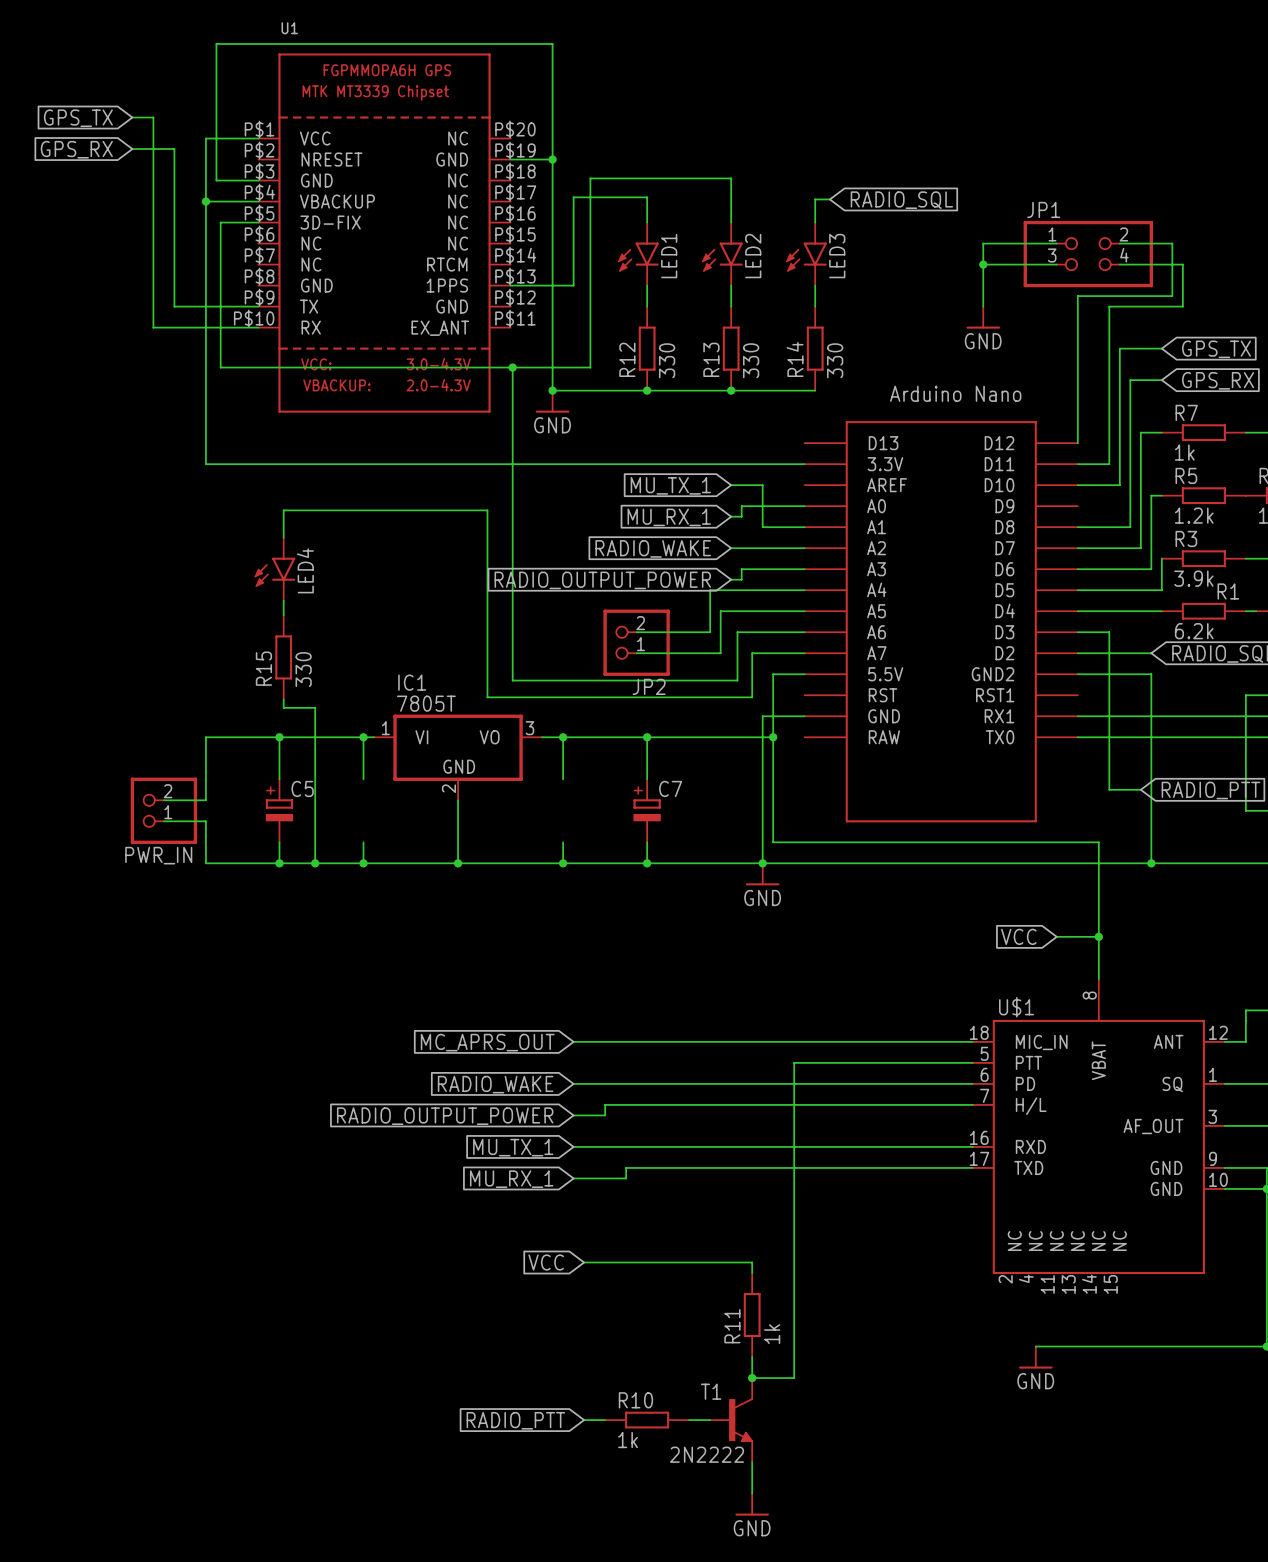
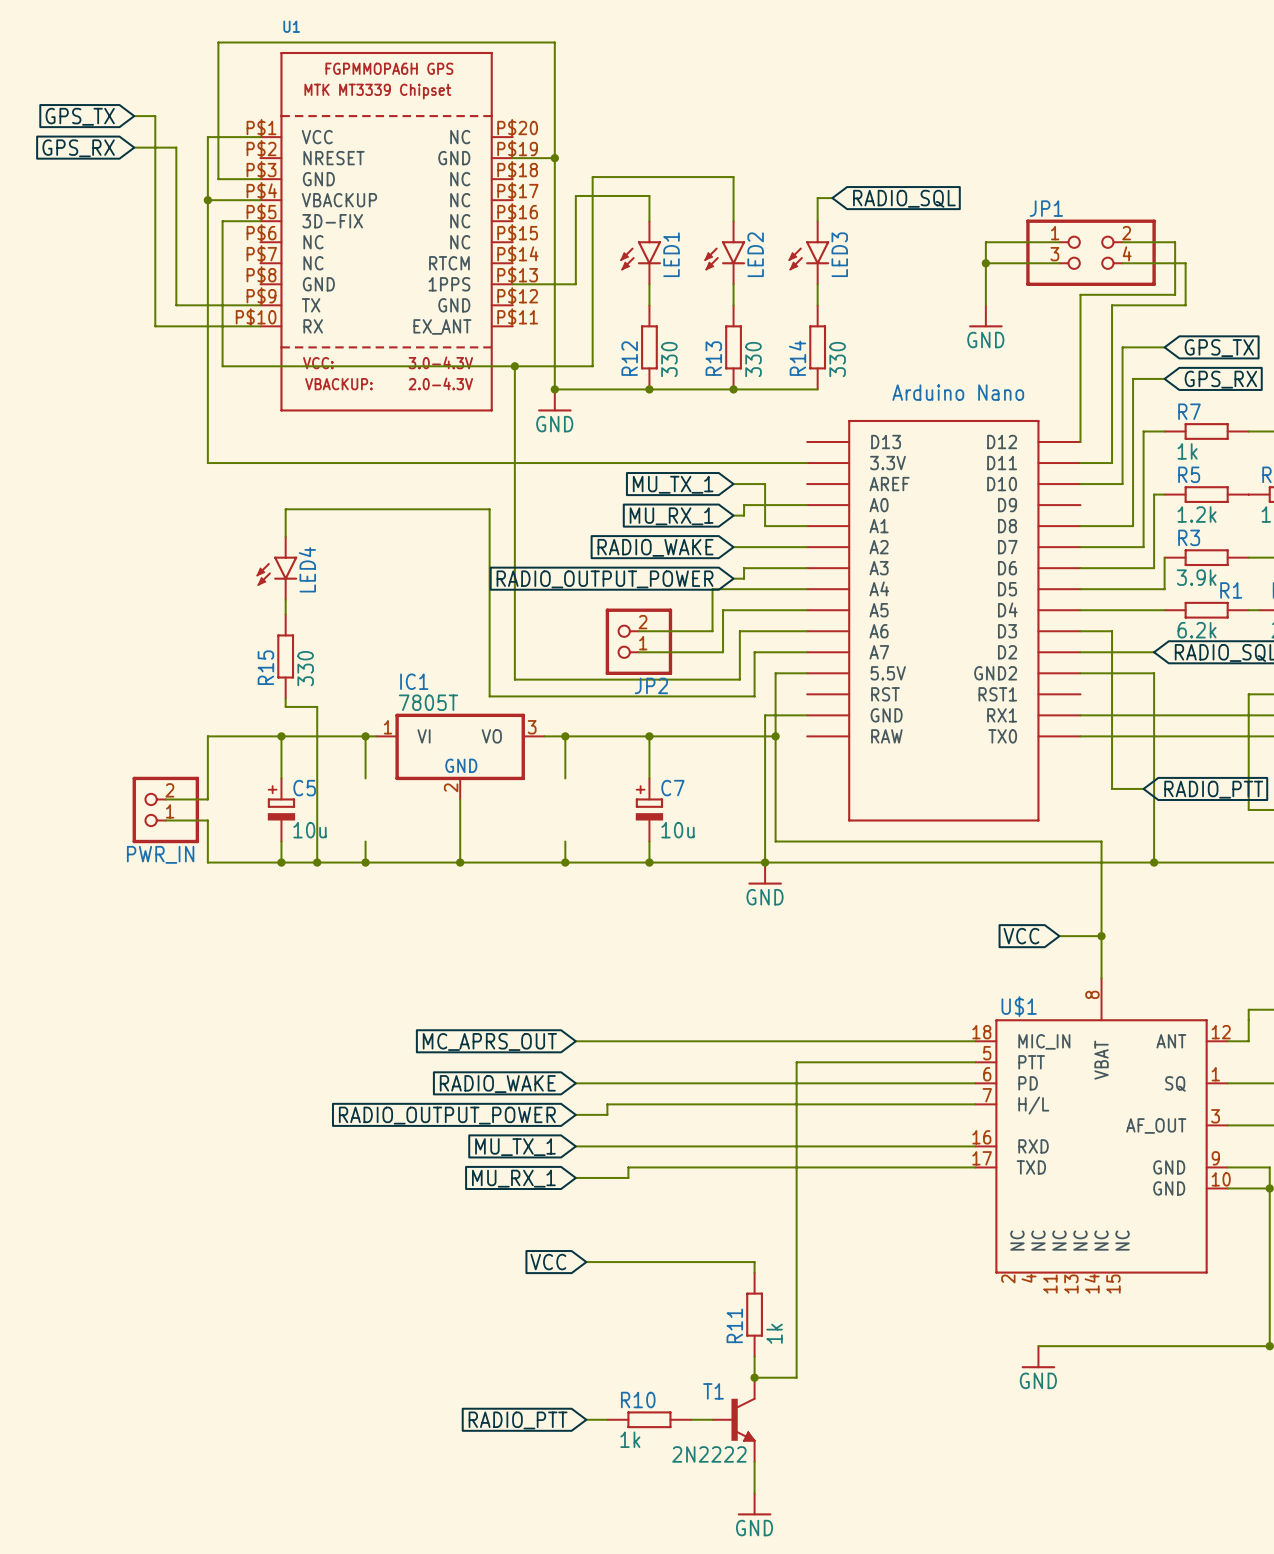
C5 value: none -> 10u (309, 830)
C7 value: none -> 10u (677, 830)

